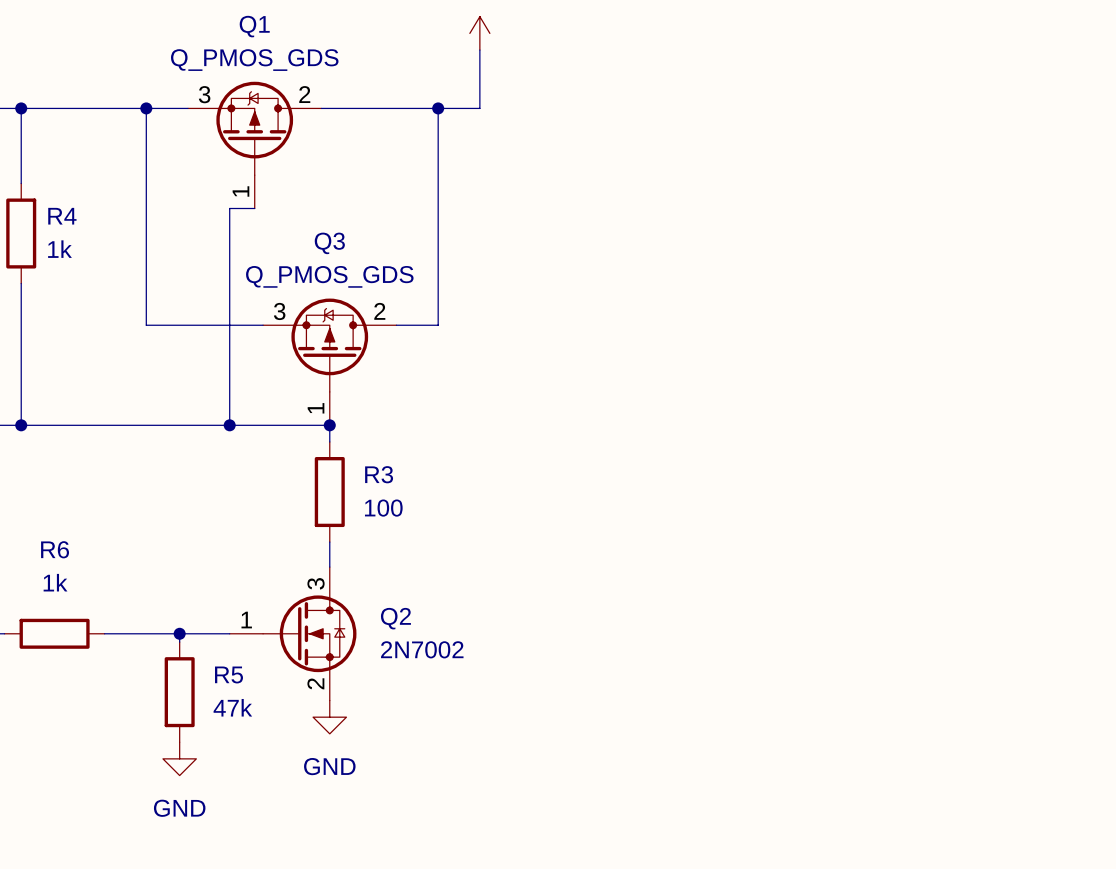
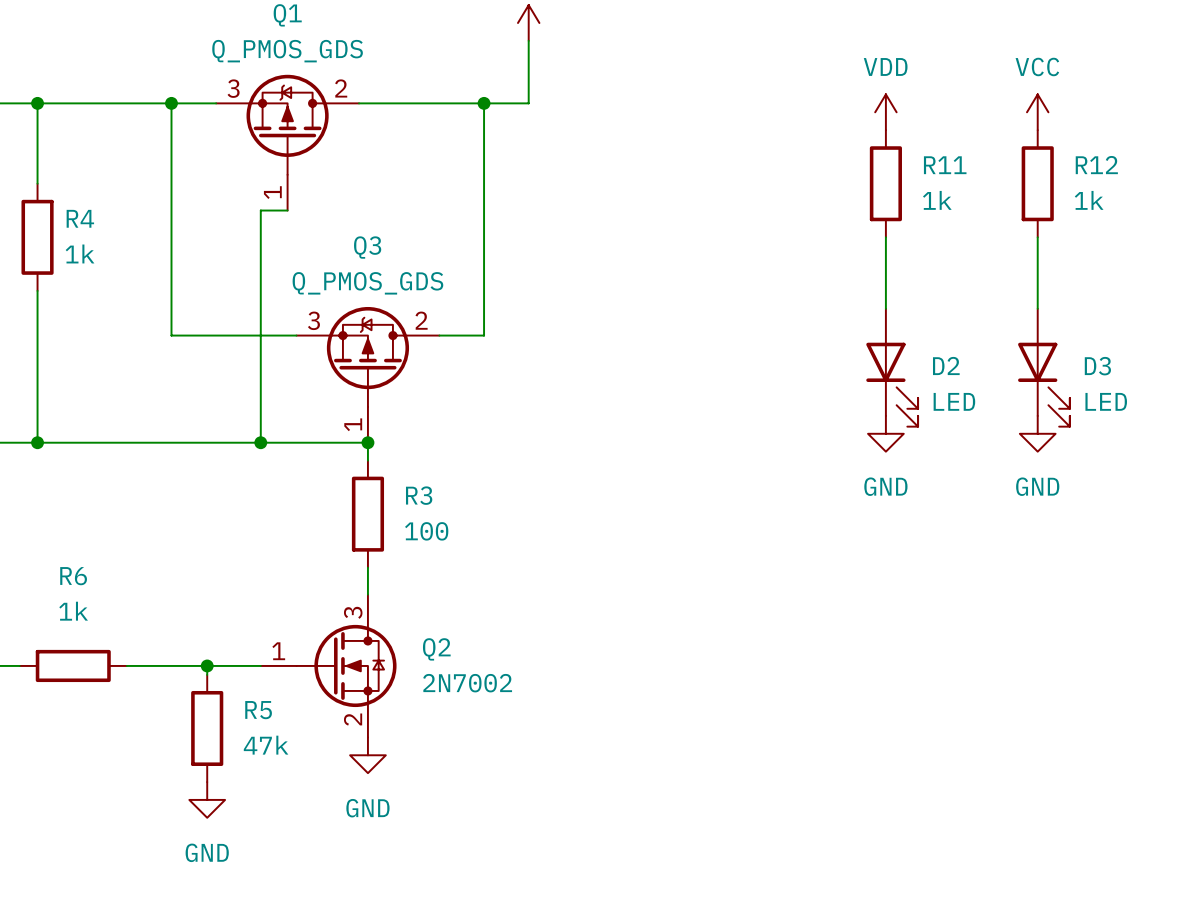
power symbol: none -> VDD (885, 112)
power symbol: none -> VCC (1037, 112)
R11: none -> 1k (885, 183)
R12: none -> 1k (1037, 183)
wire: none -> (885, 237) (885, 308)
wire: none -> (1037, 237) (1037, 308)
D2: none -> LED (892, 367)
D3: none -> LED (1043, 367)
power symbol: none -> GND (885, 433)
power symbol: none -> GND (1037, 433)

